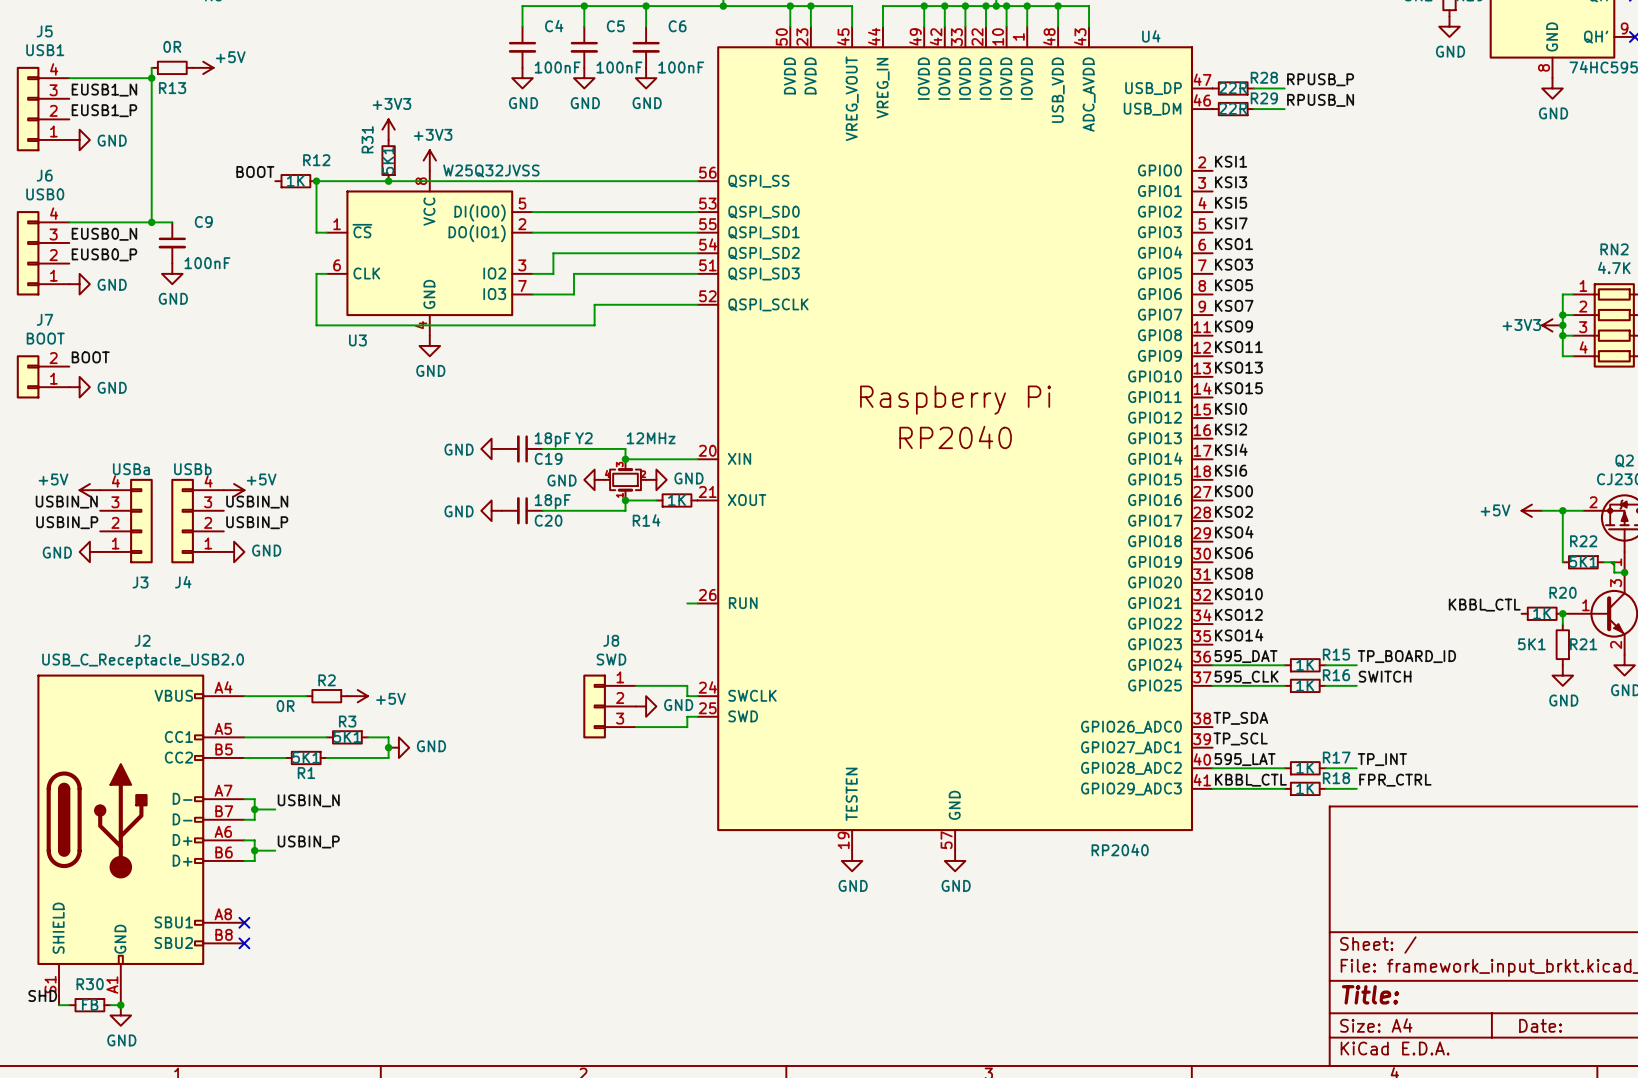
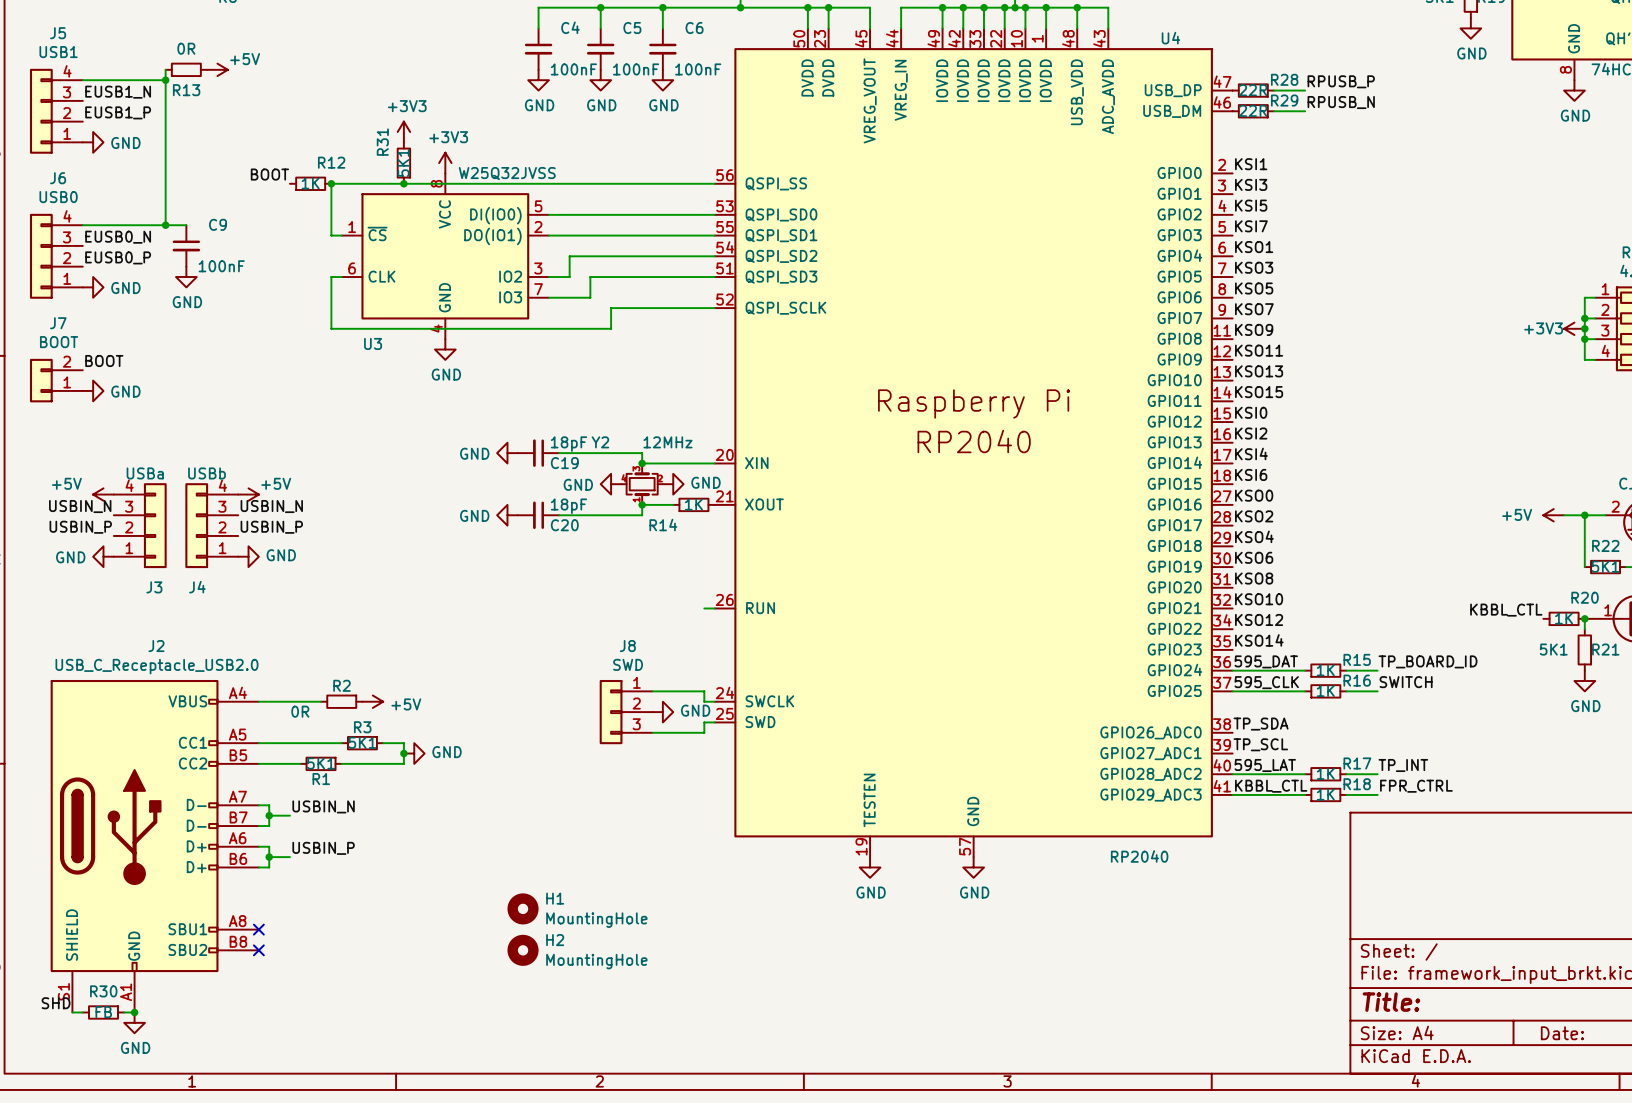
H1: none -> MountingHole (523, 908)
H2: none -> MountingHole (523, 950)

